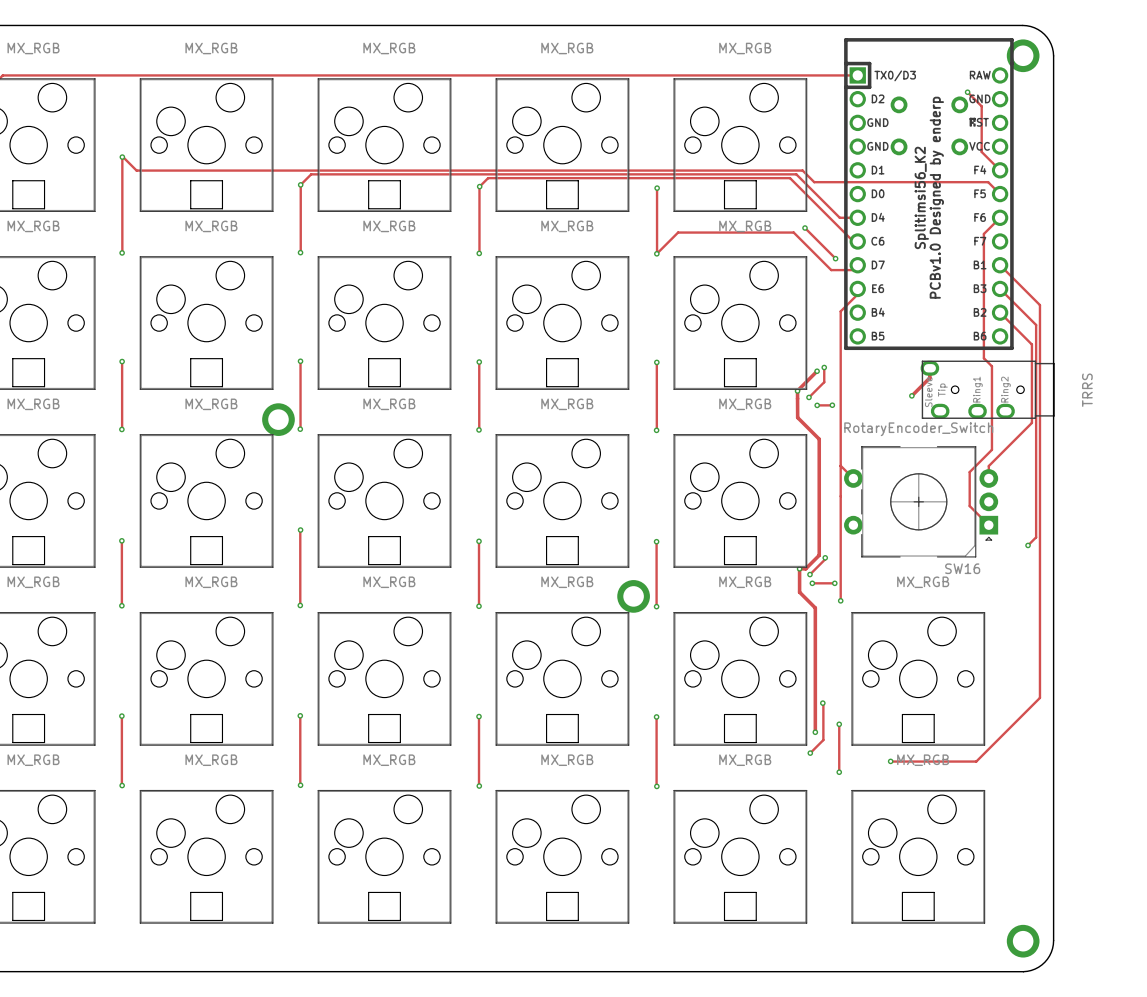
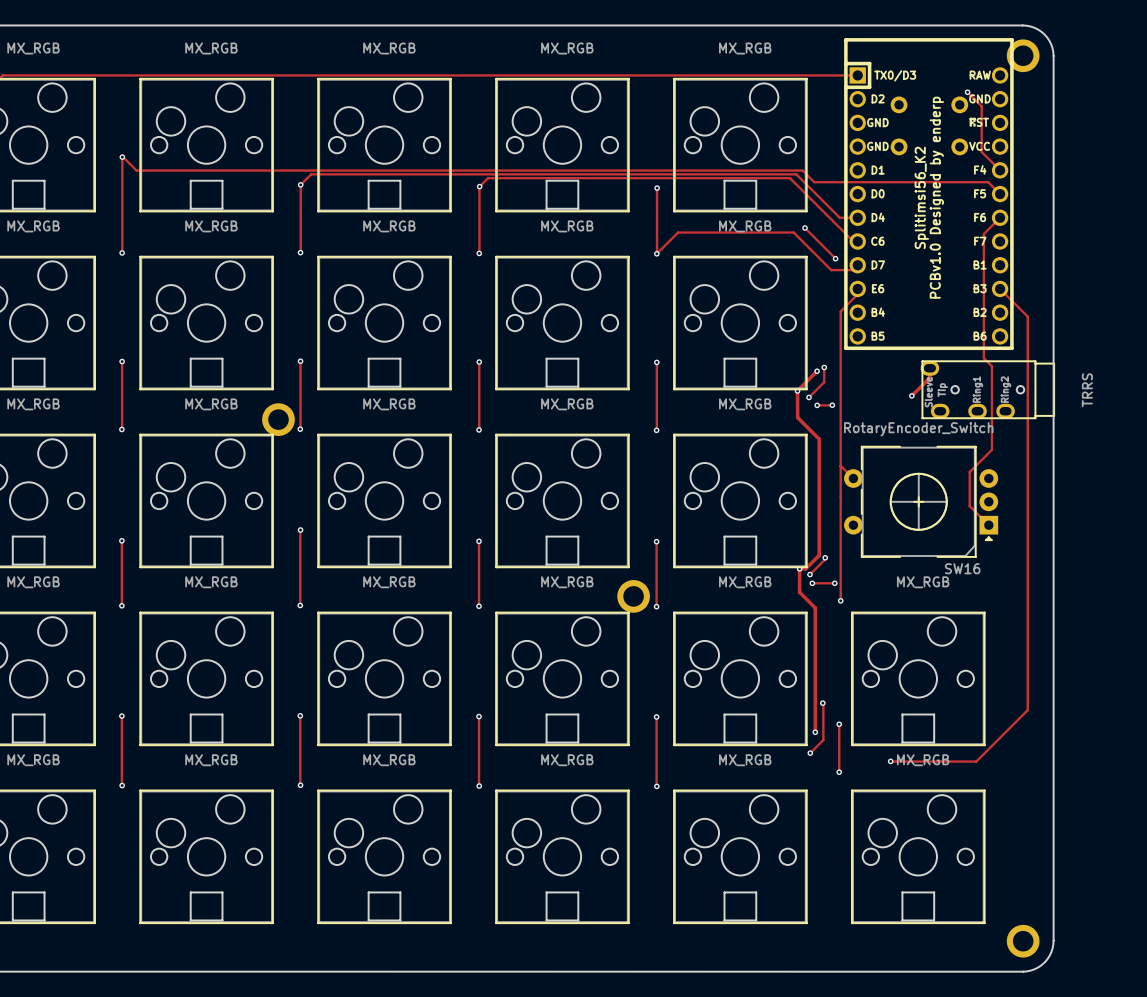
track: (1000, 265) (1039, 305) (1039, 697) (1027, 710) -> (1027, 316) (1027, 710)
track: (1000, 312) (1031, 344) (1031, 422) (988, 466) (988, 478) -> none
track: (1027, 316) (1036, 325) (1036, 537) (1028, 545) -> none
via: (1028, 545) -> none

